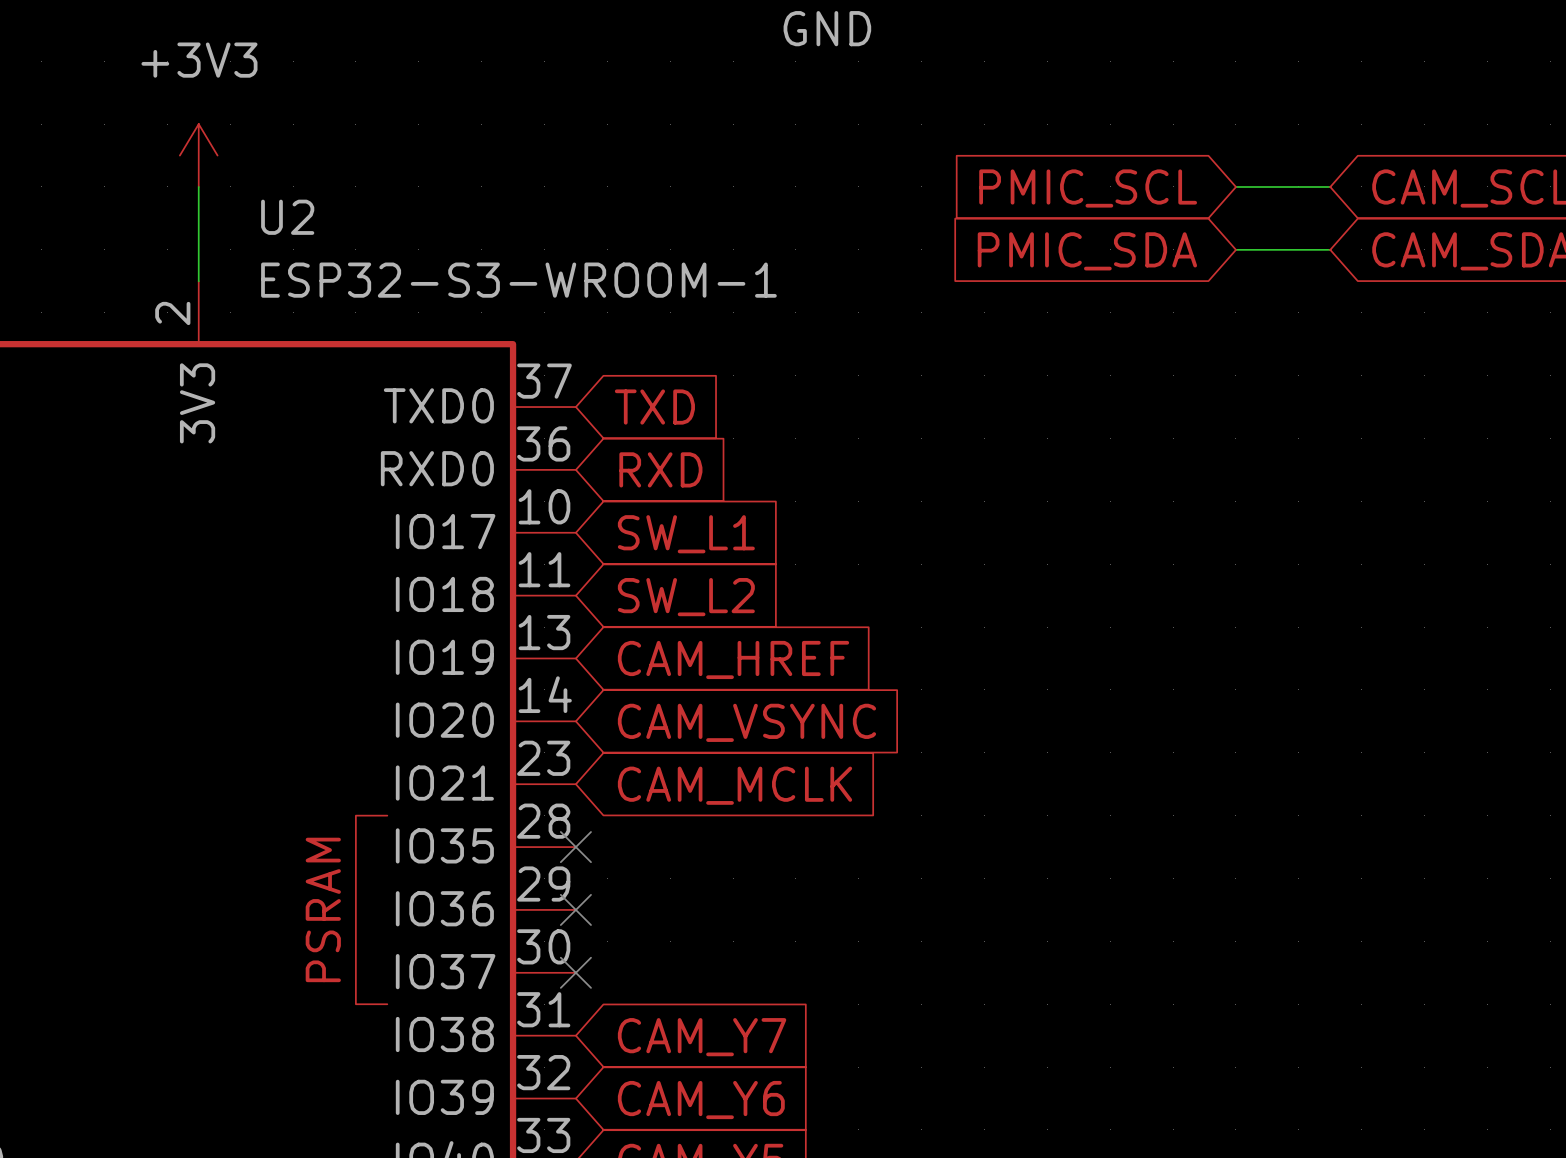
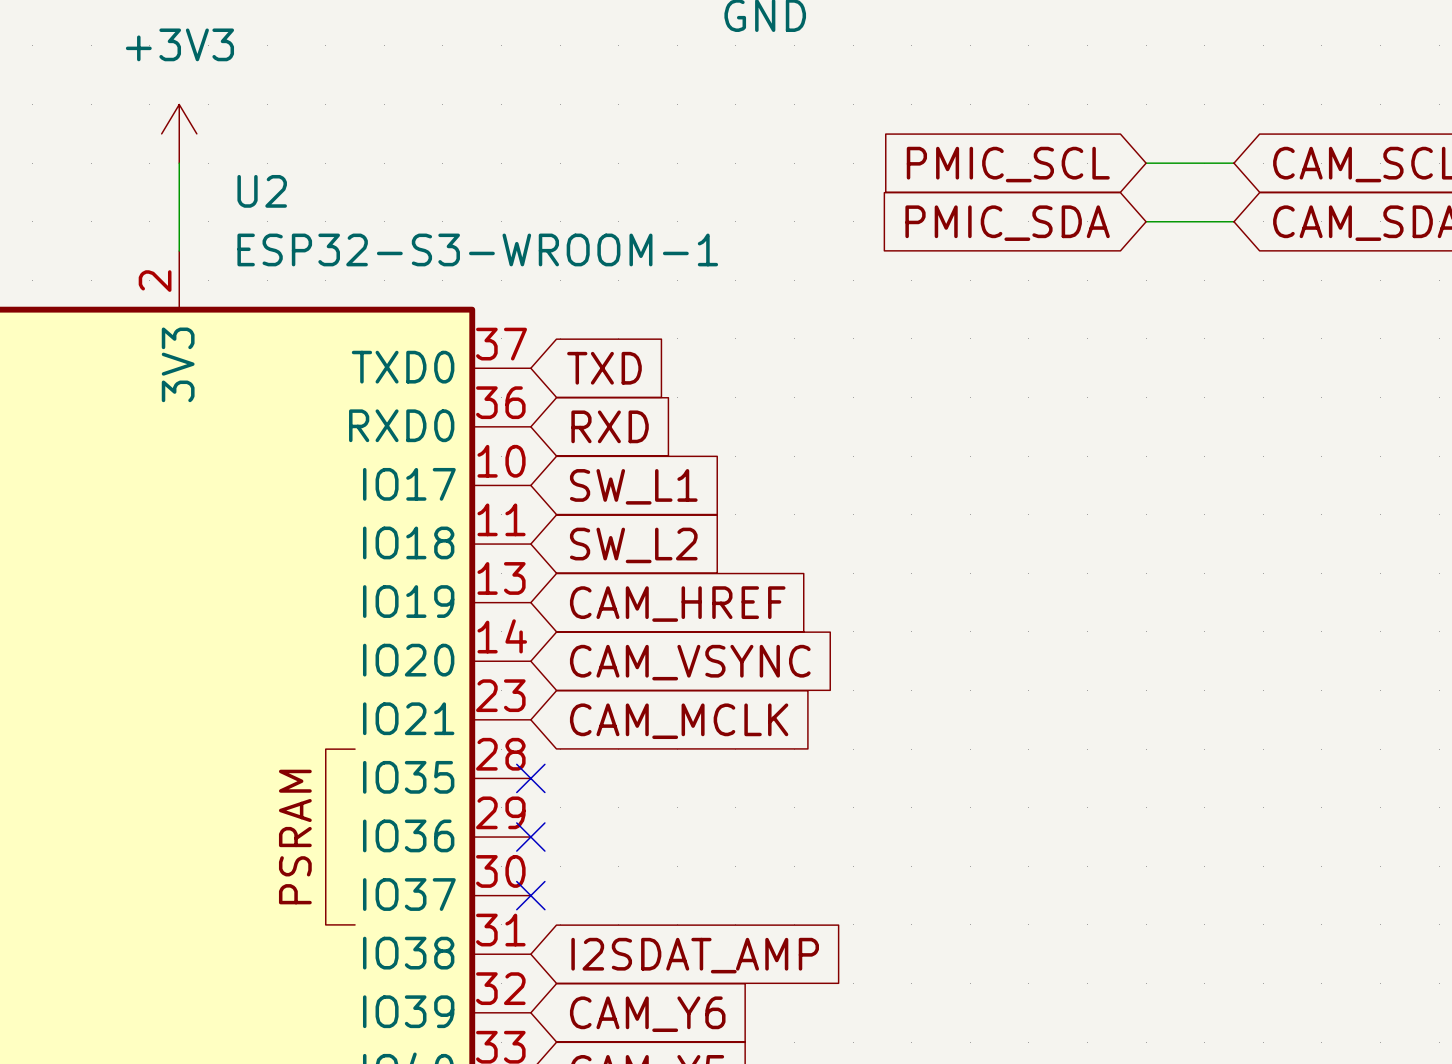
global label: CAM_Y7 (702, 1037) -> I2SDAT_AMP (695, 955)

